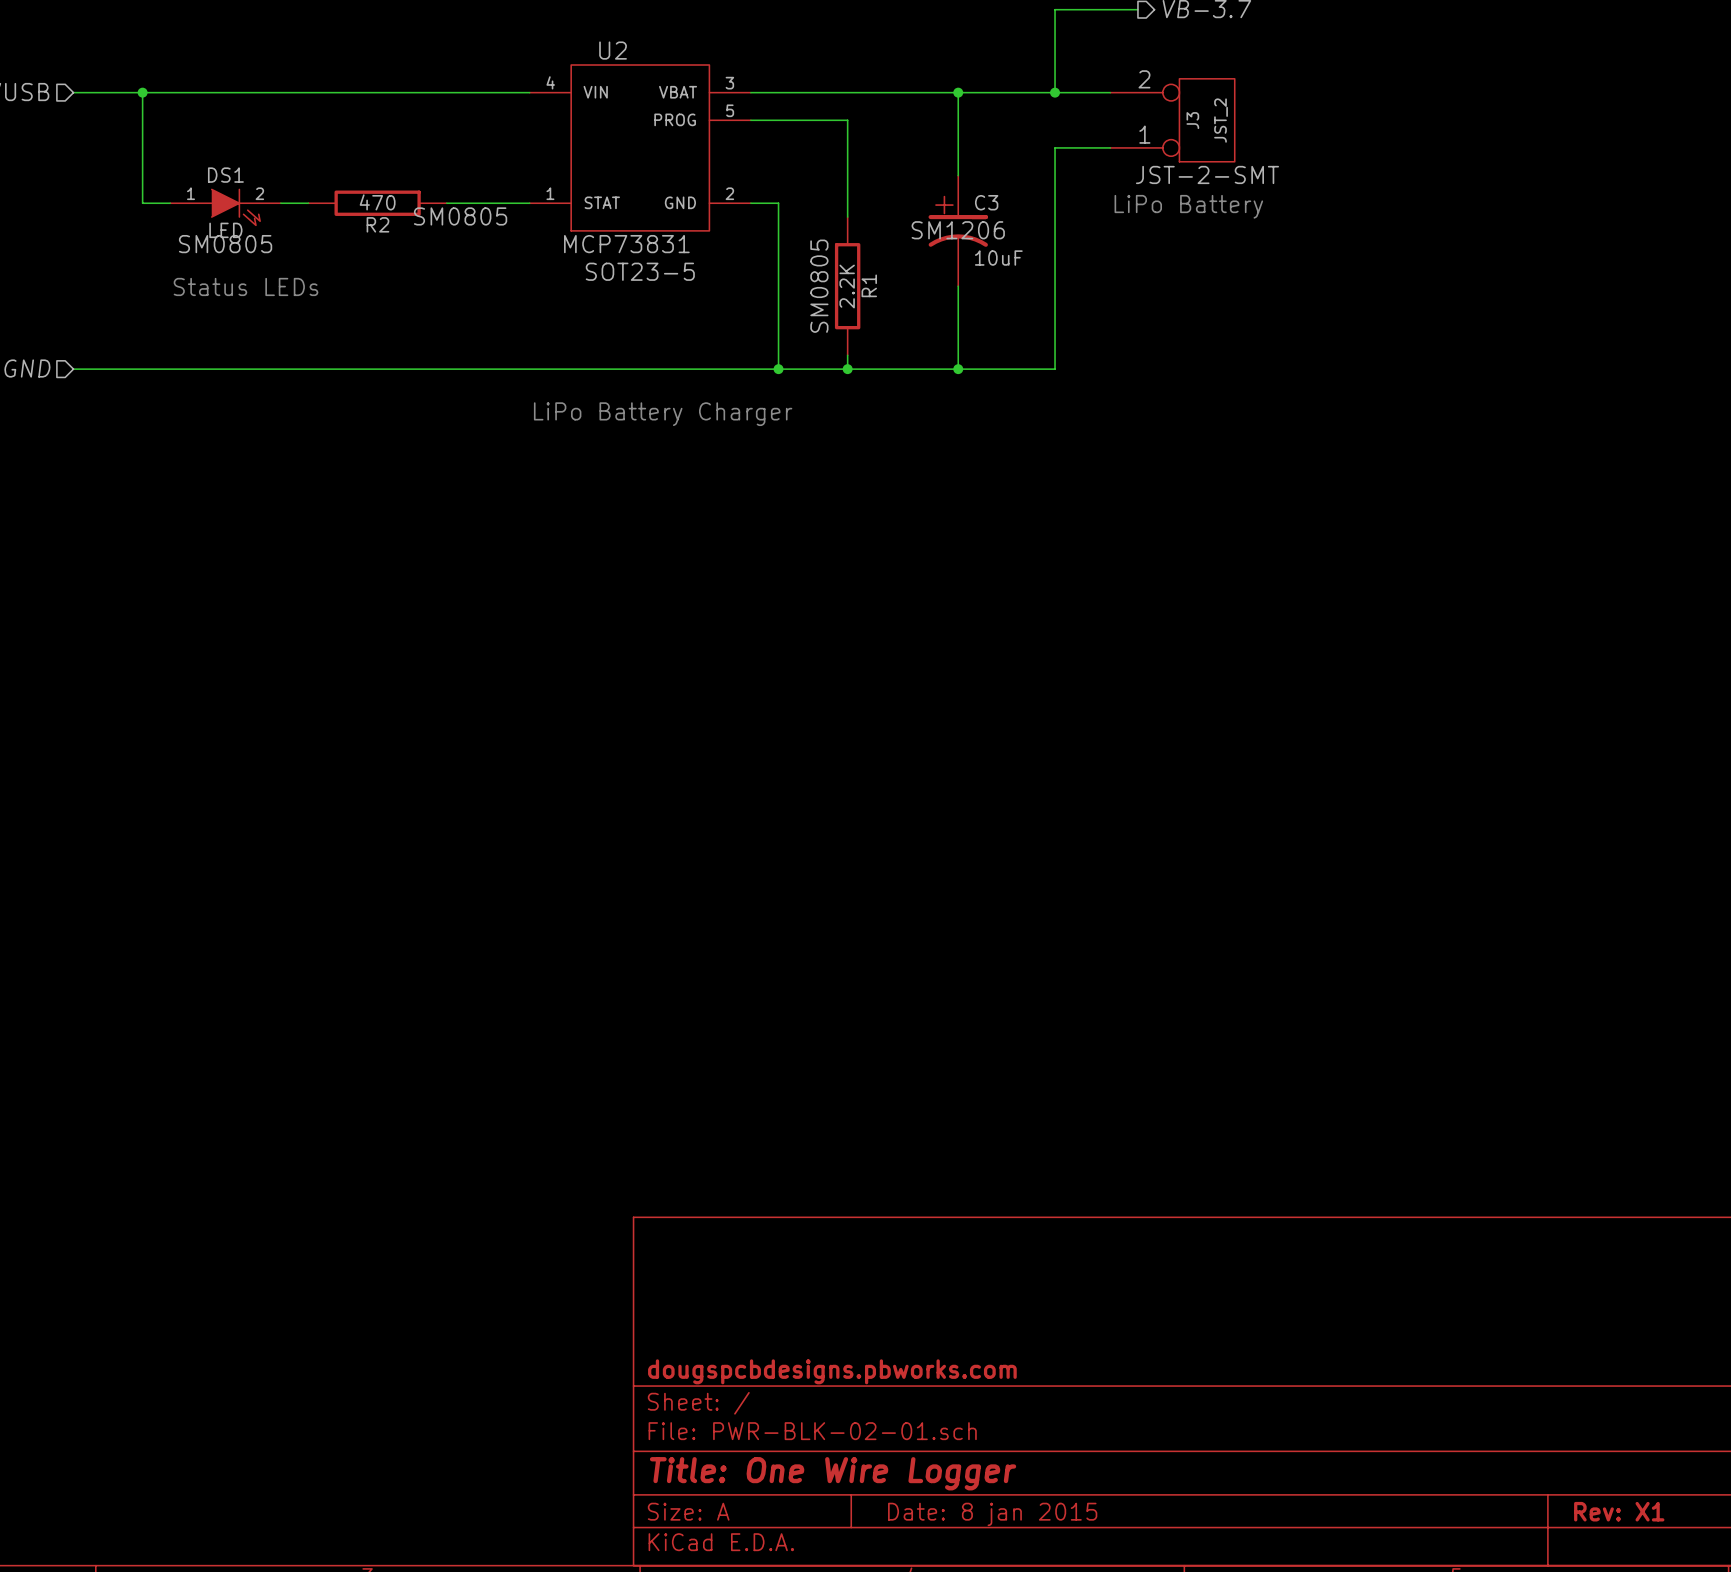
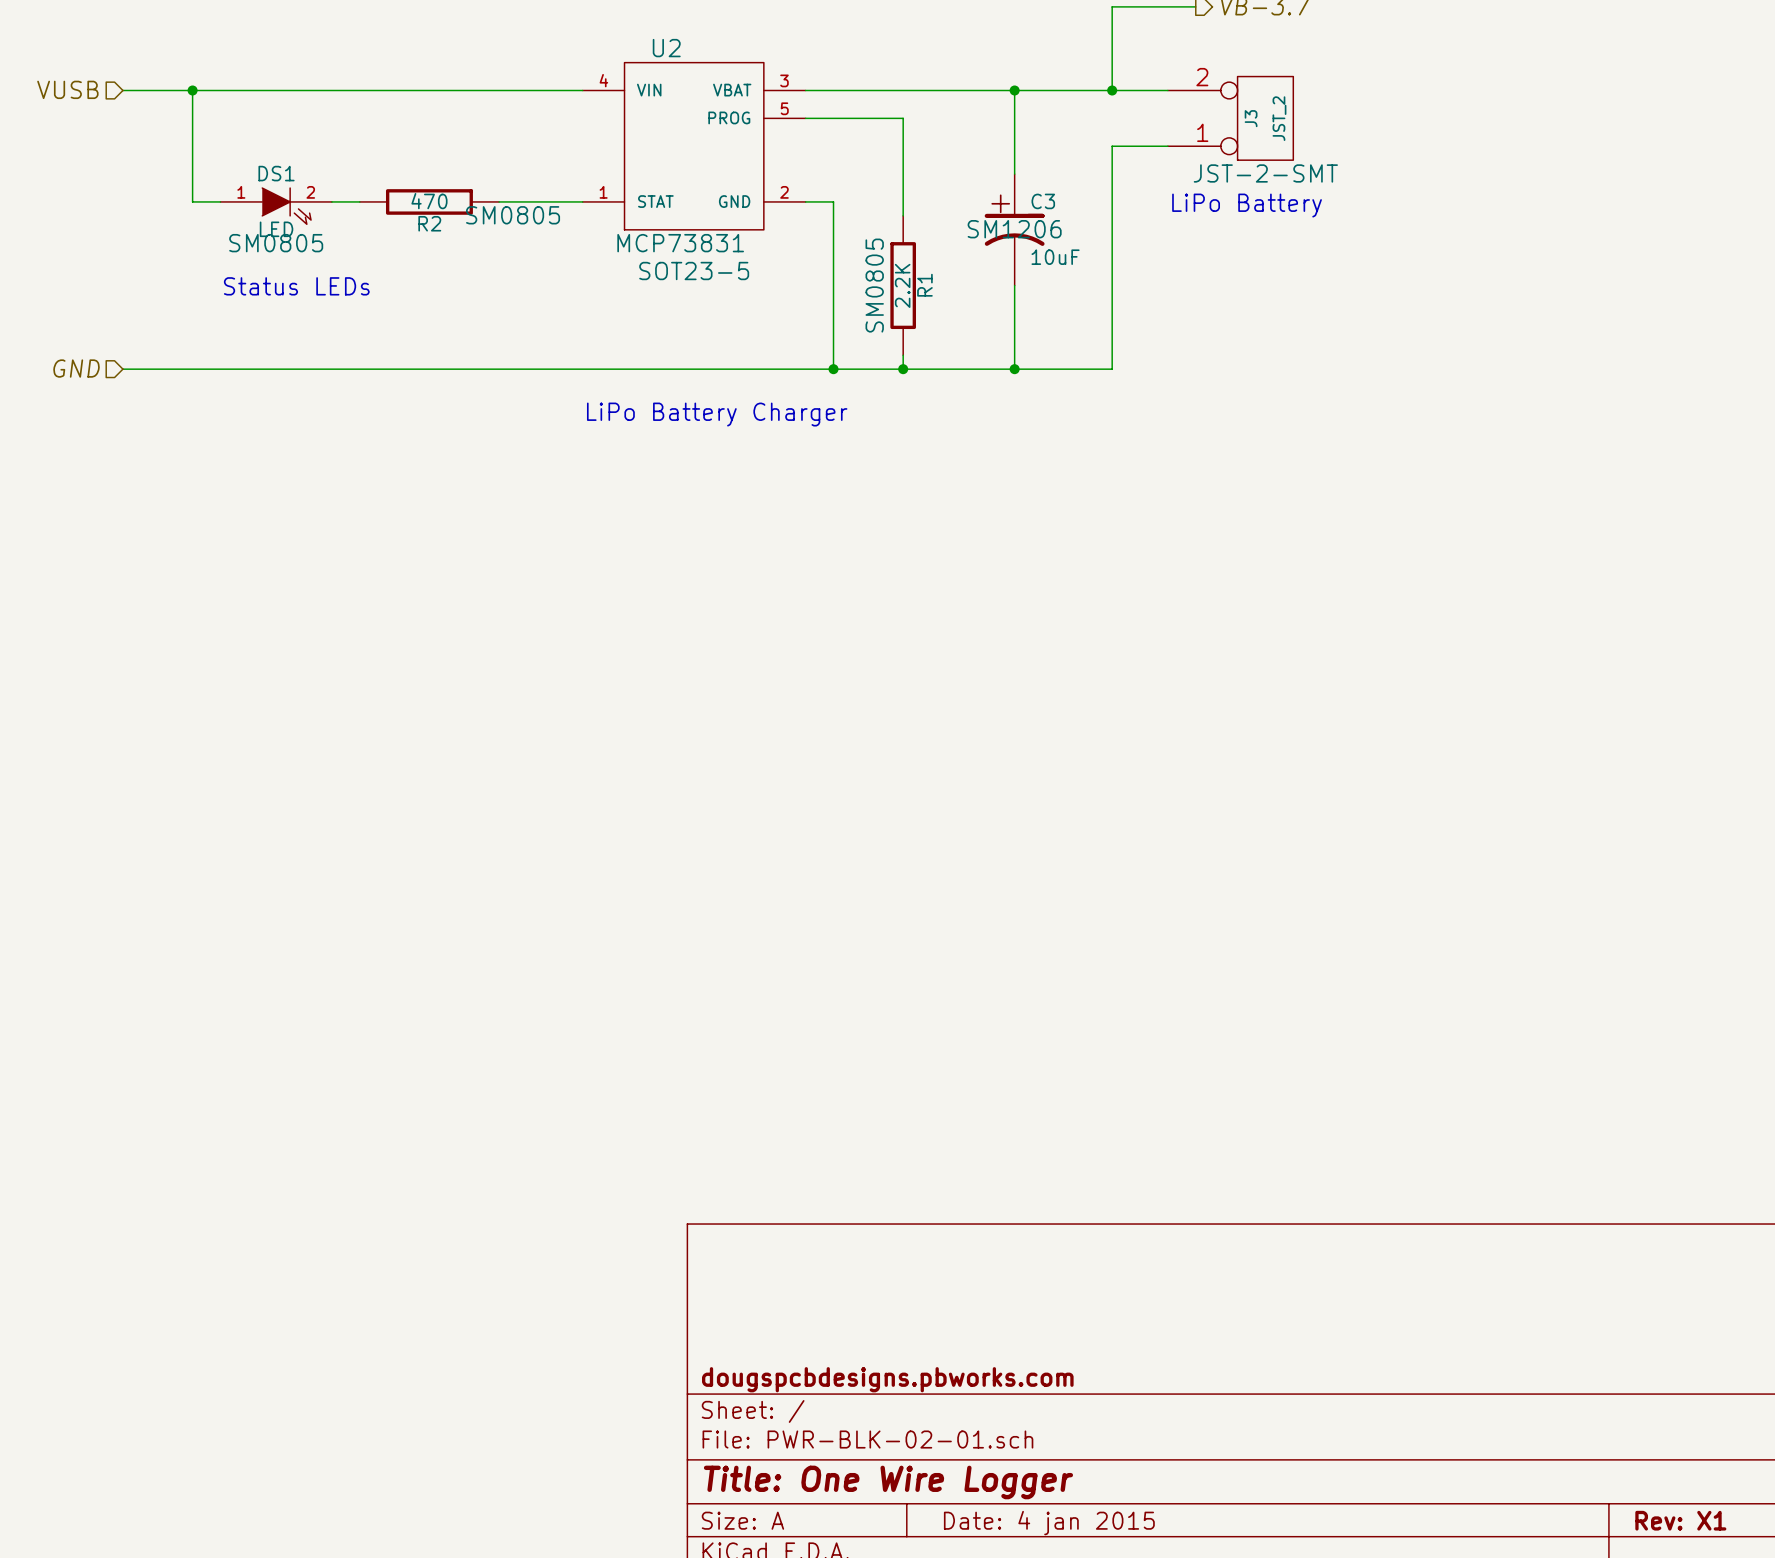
title block: Date: 8 jan 2015 (992, 1514) -> Date: 4 jan 2015 (1049, 1523)

